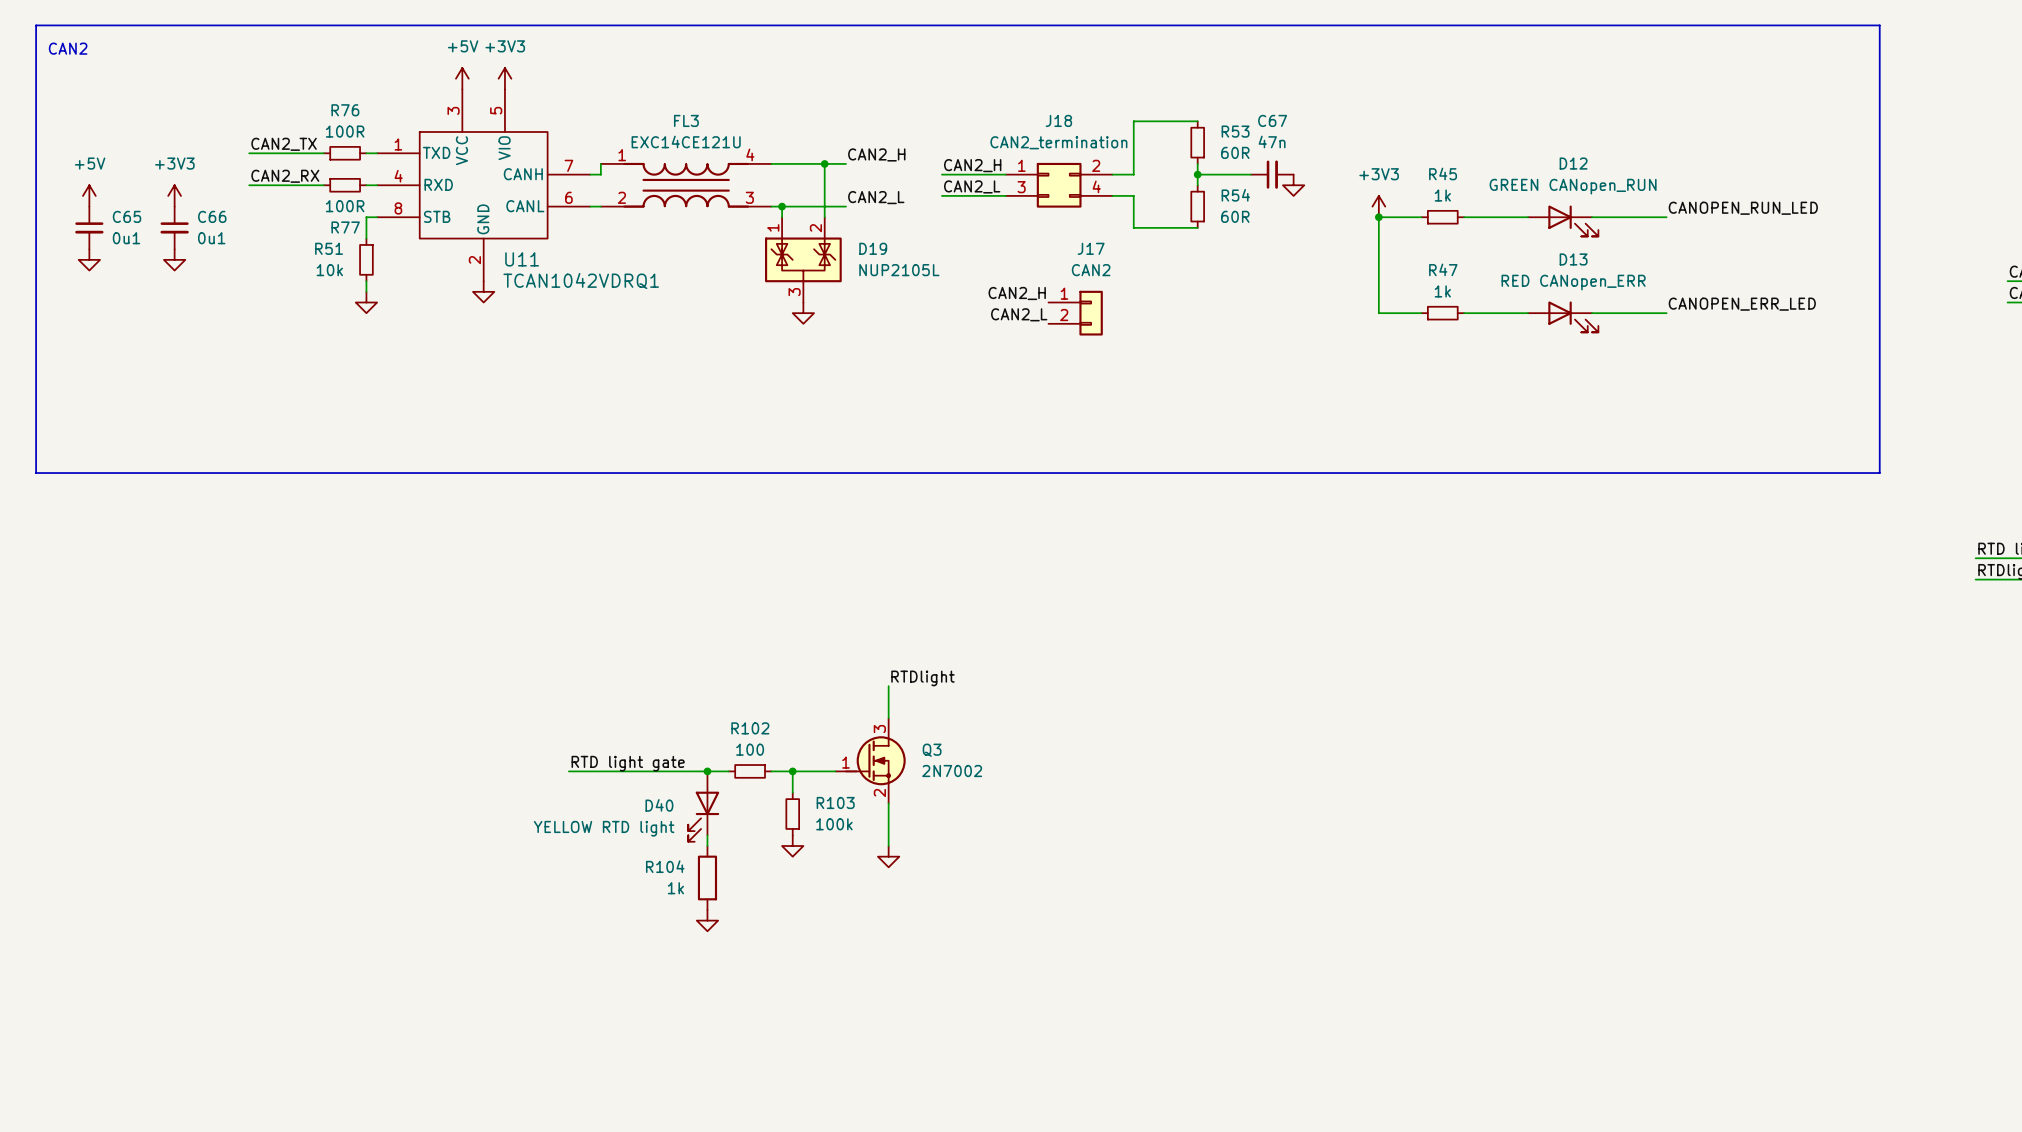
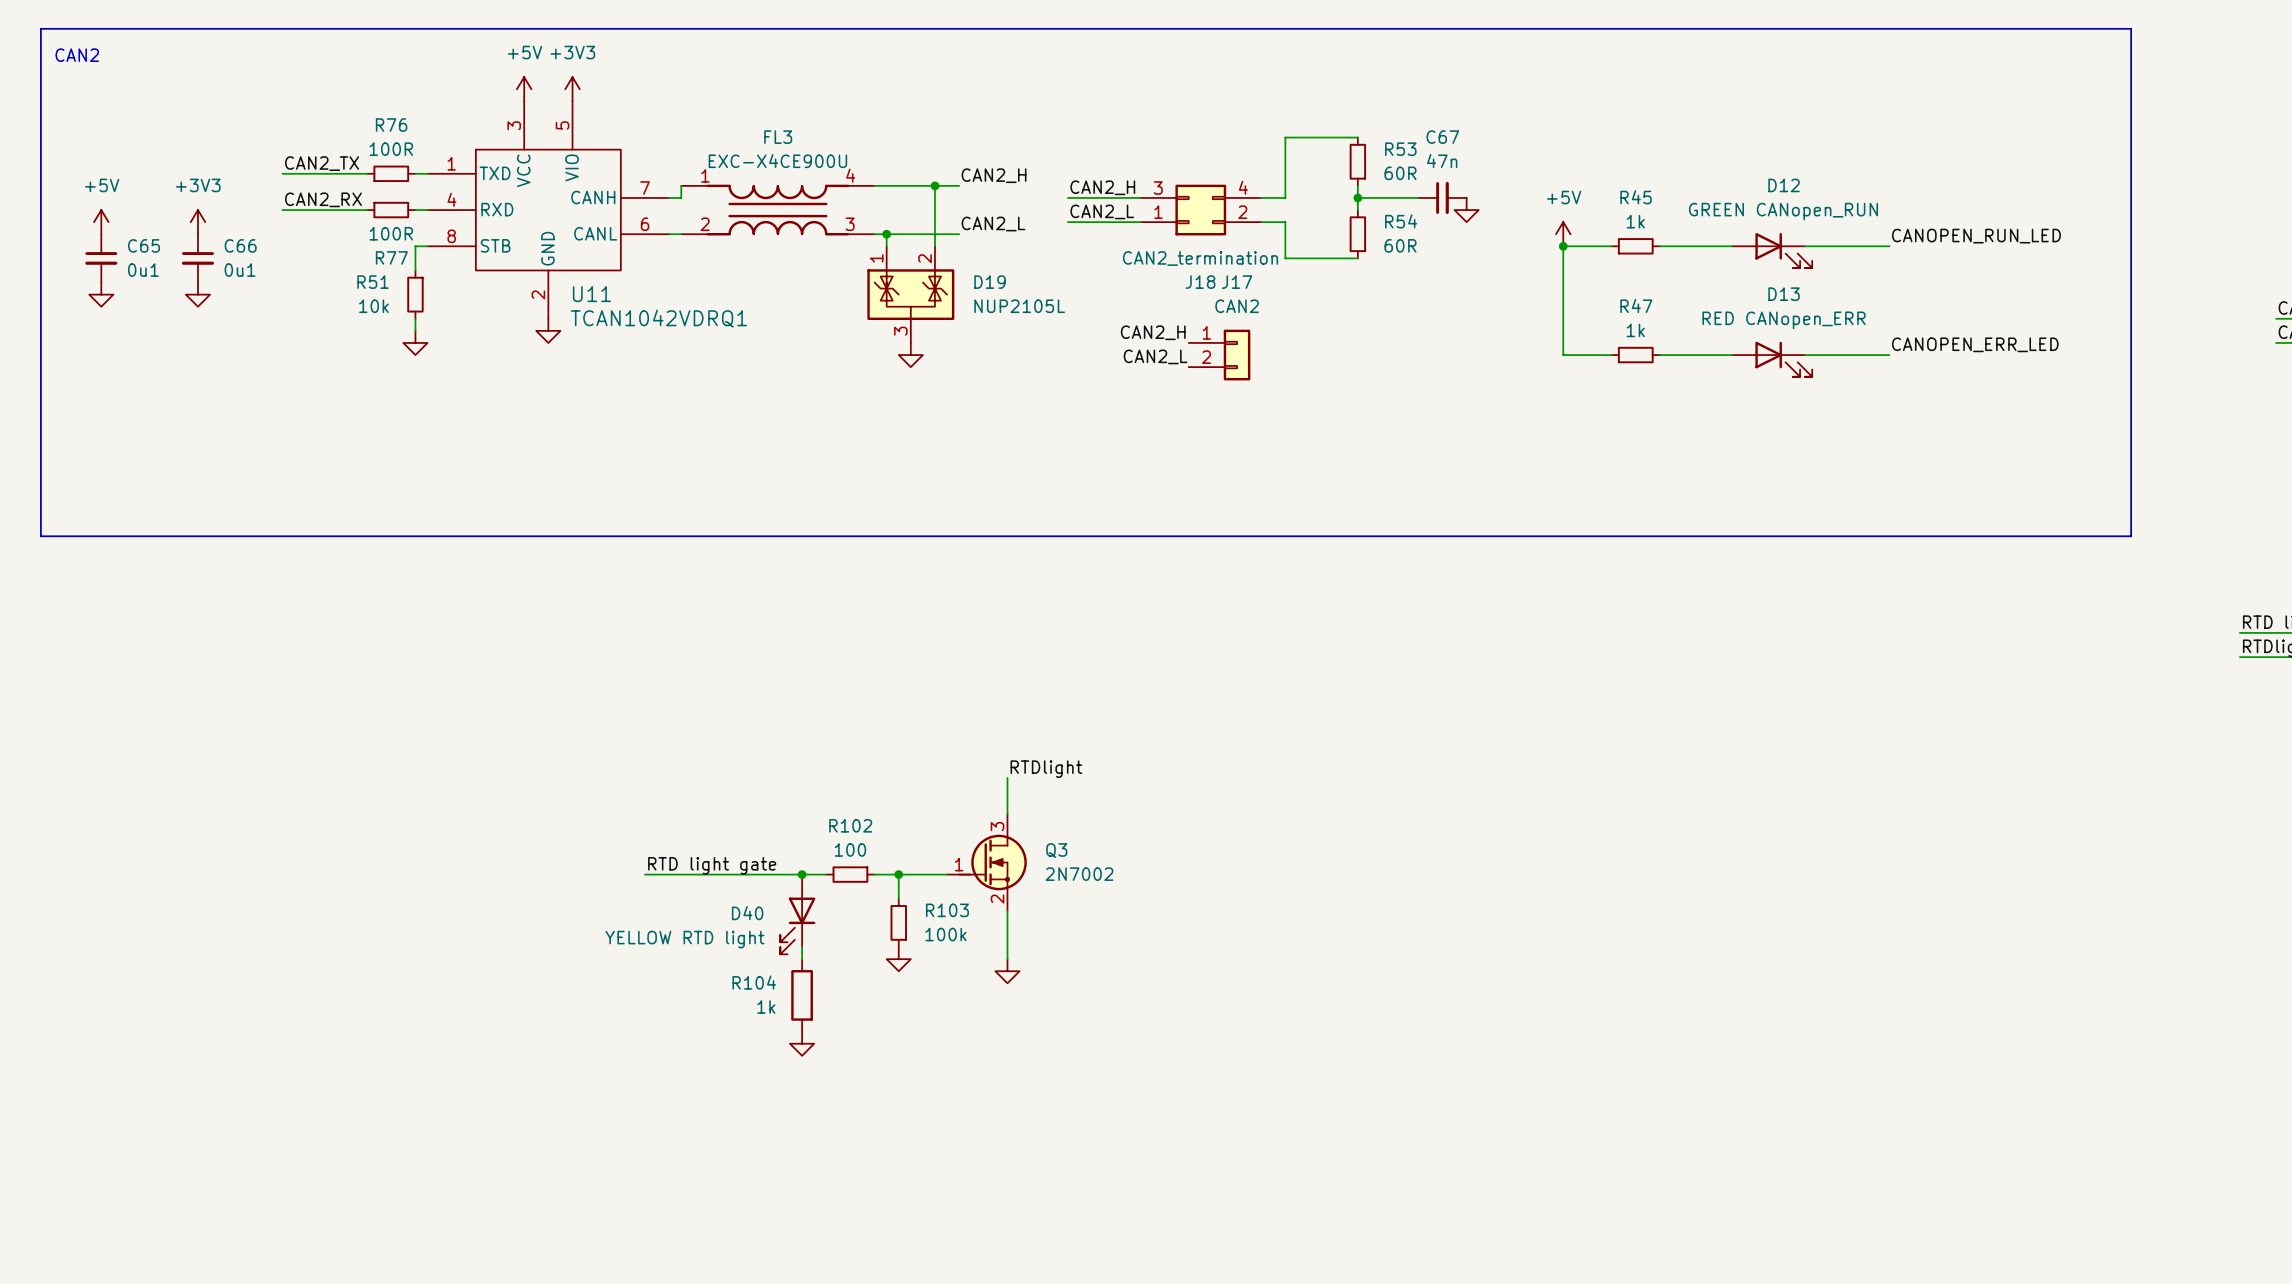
FL3 value: EXC14CE121U (686, 141) -> EXC-X4CE900U (777, 160)
J18 flip: as is (1059, 185) -> up-down (1200, 210)
power symbol: +3V3 (1378, 206) -> +5V (1563, 234)

